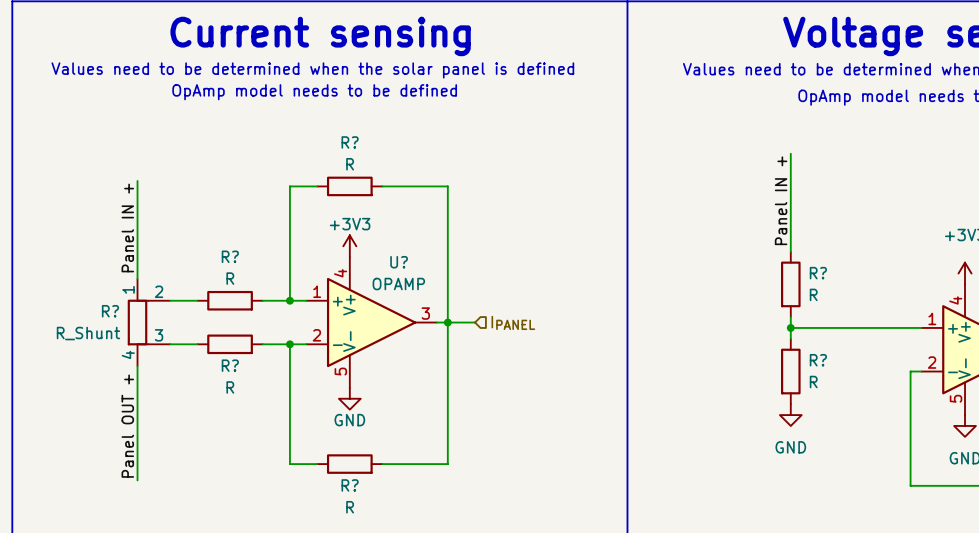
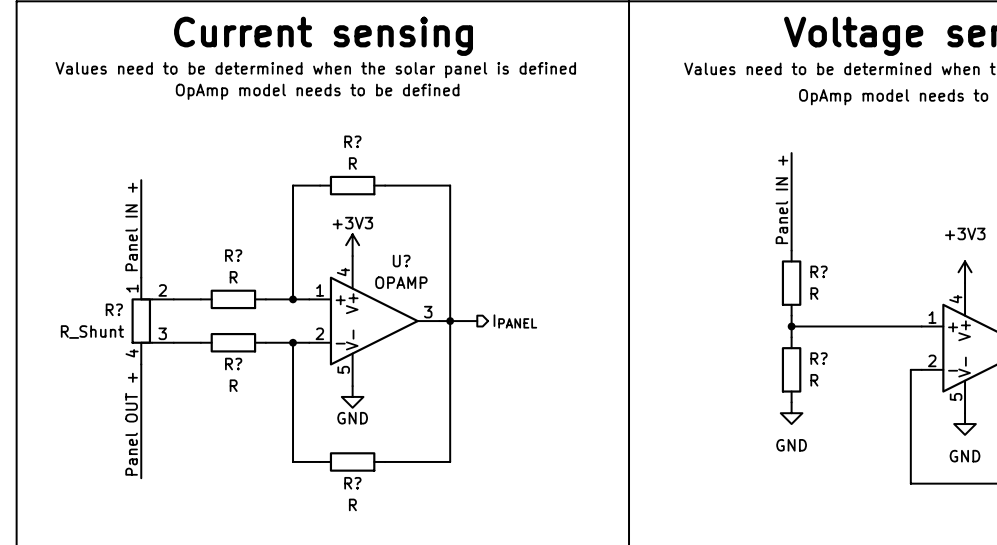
hierarchical label shape: input (513, 322) -> output (515, 321)

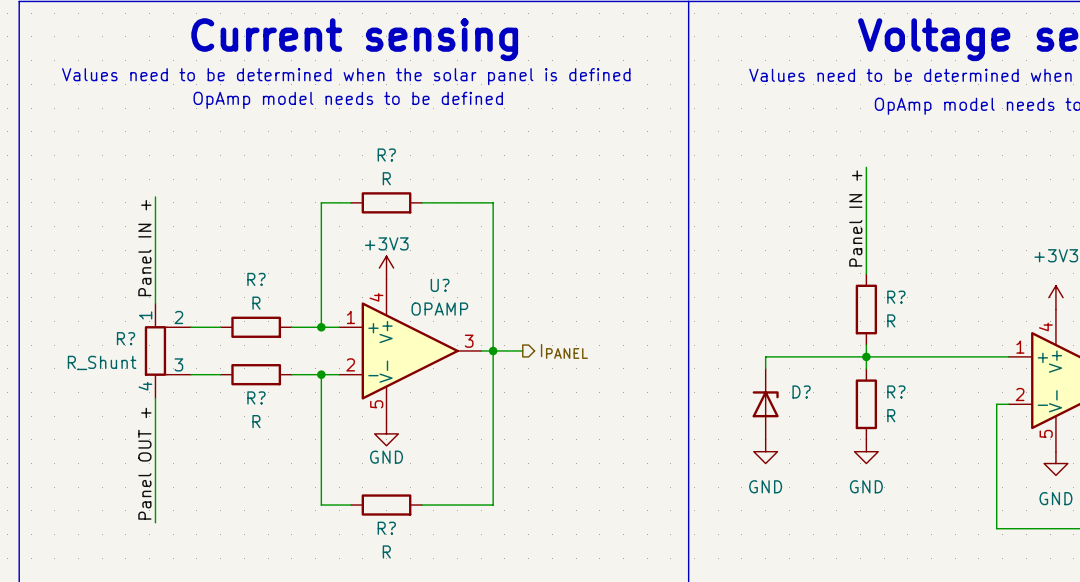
wire: none -> (866, 356) (765, 356) (765, 368)
D?: none -> (765, 404)
power symbol: none -> GND (765, 451)

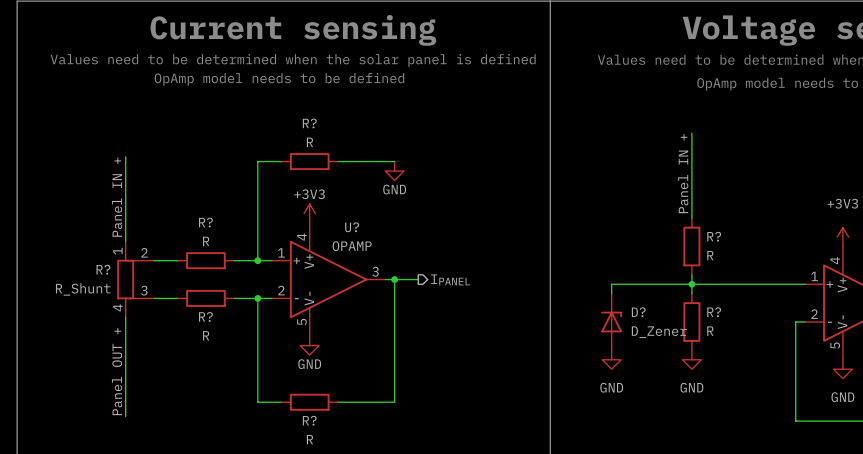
wire: (493, 202) (493, 350) -> none
power symbol: none -> GND (394, 171)
D? value: none -> D_Zener (659, 332)

